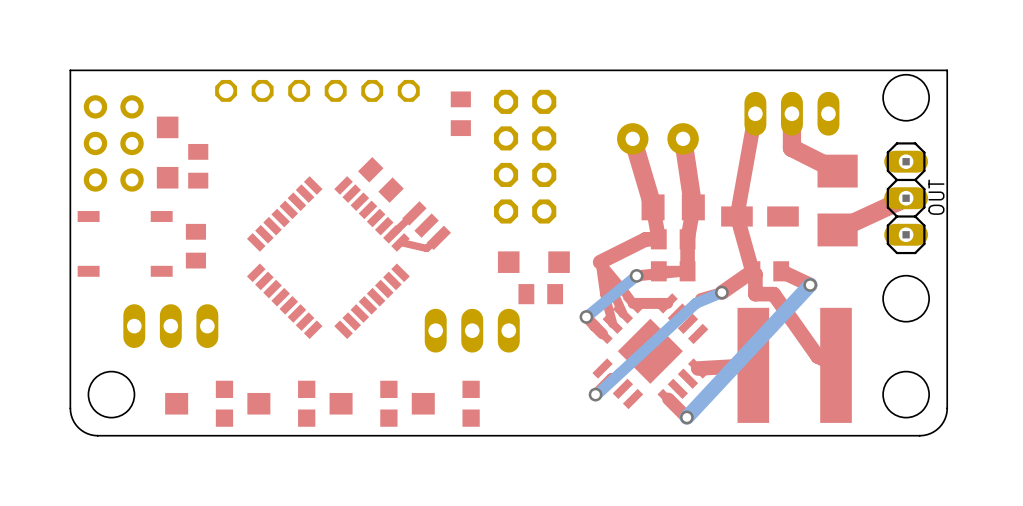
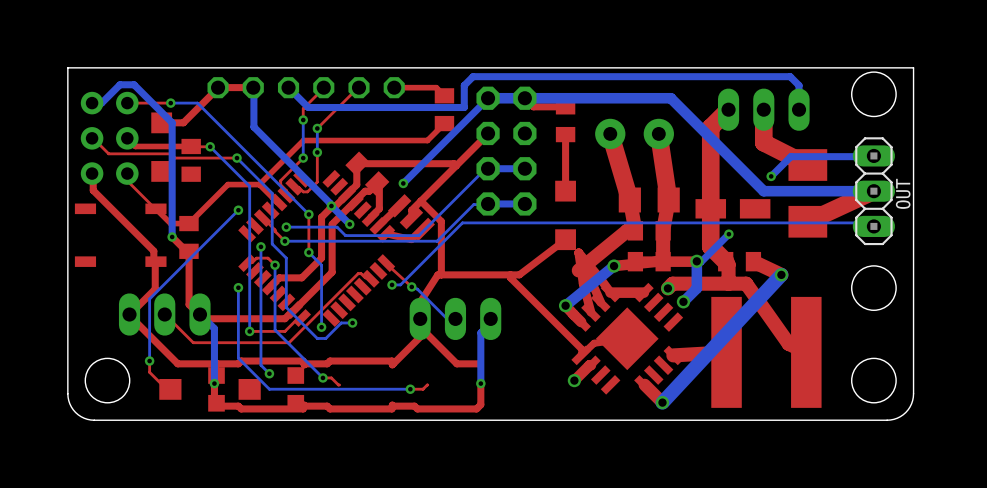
top track: none -> (253, 87) (218, 87) (183, 122) (161, 122)
bottom track: none -> (253, 87) (253, 127) (349, 224)
bottom track: none -> (288, 87) (308, 107) (464, 107) (464, 85) (473, 76) (790, 76) (799, 85) (799, 109)
top track: none -> (323, 87) (303, 108) (303, 120)
top track: none -> (359, 87) (317, 128)
top track: none -> (394, 87) (436, 87) (444, 95)
top track: none -> (524, 98) (533, 106) (565, 106)
bottom track: none -> (92, 103) (101, 103) (120, 84) (134, 84) (172, 122) (172, 236)
top track: none -> (170, 103) (127, 103)
bottom track: none -> (170, 103) (197, 103) (308, 214)
via: none -> (170, 103)
top track: (755, 113) (736, 216) -> (728, 109) (710, 127) (710, 246) (725, 261)
bottom track: none -> (303, 120) (303, 158)
via: none -> (303, 120)
top track: none -> (444, 123) (427, 140) (303, 140) (259, 184) (277, 202) (278, 202) (260, 184) (227, 184) (188, 223) (170, 223) (128, 182) (127, 173)
bottom track: none -> (317, 128) (317, 152)
via: none -> (317, 128)
top track: none -> (488, 133) (411, 210) (411, 217)
top track: none -> (565, 134) (565, 191)
top track: none -> (92, 138) (108, 153) (170, 153) (174, 158) (236, 158)
top track: none -> (127, 138) (135, 146) (210, 146)
bottom track: none -> (210, 146) (249, 186) (249, 331)
via: none -> (210, 146)
top track: none -> (317, 152) (317, 182) (307, 191) (303, 191) (299, 187) (294, 186)
via: none -> (317, 152)
bottom track: none -> (873, 155) (790, 156) (771, 176)
bottom track: none -> (236, 158) (272, 193) (272, 244) (286, 258) (286, 307) (317, 338) (325, 338) (341, 322) (352, 322)
via: none -> (236, 158)
top track: none -> (303, 158) (280, 180) (280, 184) (286, 190) (286, 194)
via: none -> (303, 158)
top track: none -> (456, 165) (454, 163) (357, 163) (356, 184) (347, 194)
bottom track: none -> (524, 168) (485, 169) (418, 235) (345, 235) (337, 227) (286, 227)
top track: none -> (92, 173) (93, 190) (153, 251) (153, 259) (155, 261) (155, 289) (129, 314) (177, 363) (216, 364) (238, 363) (241, 361) (303, 361) (304, 364) (327, 363) (330, 361) (392, 361) (392, 364) (423, 334) (417, 325)
via: none -> (771, 176)
bottom track: none -> (403, 183) (488, 98) (670, 98) (763, 191) (873, 191)
via: none -> (403, 183)
top track: none -> (346, 194) (335, 205) (331, 205) (321, 217) (321, 258) (301, 277) (279, 277) (270, 286)
top track: none -> (420, 201) (441, 221) (441, 274)
bottom track: none -> (524, 203) (473, 204) (437, 241) (284, 241)
via: none -> (331, 205)
top track: (737, 216) (752, 271) (721, 292) (700, 298) -> none
bottom track: none -> (238, 210) (149, 299) (149, 361)
via: none -> (238, 210)
top track: none -> (308, 214) (308, 252)
via: none -> (308, 214)
top track: none -> (262, 218) (284, 241)
top track: none -> (370, 218) (379, 208) (379, 184) (377, 183) (369, 191) (365, 191) (332, 224) (332, 272) (284, 318) (205, 318) (198, 314) (189, 304) (188, 251) (186, 251) (172, 236)
via: none -> (349, 224)
bottom track: none -> (873, 226) (869, 222) (462, 222) (400, 284) (392, 284)
via: none -> (286, 227)
top track: (650, 239) (645, 239) (600, 262) -> (627, 230) (578, 270)
bottom track: none -> (728, 234) (700, 262) (696, 261) (696, 288) (683, 301)
via: none -> (728, 234)
via: none -> (172, 236)
top track: none -> (565, 239) (519, 274) (437, 274) (417, 305) (417, 325)
via: none -> (284, 241)
bottom track: none -> (260, 246) (260, 365) (269, 373)
via: none -> (260, 246)
bottom track: none -> (308, 252) (321, 265) (321, 327)
via: none -> (308, 252)
part rotation: 0° (533, 262) -> 90° clockwise (565, 215)
part position: (533, 262) -> (565, 215)
top track: none -> (696, 261) (663, 261)
via: none -> (696, 261)
top track: none -> (247, 263) (252, 262) (256, 258) (268, 258) (275, 265)
top track: none -> (386, 263) (411, 286)
bottom track: none -> (275, 265) (275, 330) (322, 377)
via: none -> (275, 265)
top track: none -> (510, 274) (510, 277) (582, 349) (581, 355) (594, 343) (627, 338)
top track: none -> (370, 278) (358, 273) (289, 342) (193, 342) (164, 314)
bottom track: (721, 292) (696, 303) (595, 394) -> none
via: (721, 292) -> none
part rotation: 0° (540, 294) -> 90° clockwise (565, 120)
part position: (540, 294) -> (565, 120)
top track: none -> (728, 283) (672, 283) (667, 288)
via: none -> (392, 284)
bottom track: none -> (411, 286) (417, 289) (453, 325)
via: none -> (411, 286)
bottom track: none -> (238, 287) (238, 358) (269, 389) (410, 389)
via: none -> (238, 287)
via: none -> (667, 288)
via: none -> (683, 301)
bottom track: none -> (200, 314) (214, 328) (214, 383)
top track: none -> (302, 318) (297, 318) (284, 331) (249, 331)
via: none -> (352, 322)
top track: none -> (417, 325) (456, 363) (480, 364)
bottom track: none -> (488, 325) (480, 332) (480, 383)
via: none -> (321, 327)
via: none -> (249, 331)
top track: none -> (149, 361) (149, 372) (163, 384)
via: none -> (149, 361)
via: none -> (269, 373)
top track: none -> (322, 377) (331, 377) (339, 384)
via: none -> (322, 377)
via: none -> (214, 383)
top track: none -> (480, 383) (480, 404) (476, 408) (417, 408) (414, 406) (392, 405) (392, 408) (330, 408) (327, 406) (304, 405) (303, 408) (241, 408) (238, 406) (216, 405) (214, 383)
via: none -> (480, 383)
top track: none -> (427, 384) (423, 389) (410, 389)
part: (363, 403) -> none
via: none -> (410, 389)
part: (445, 403) -> none

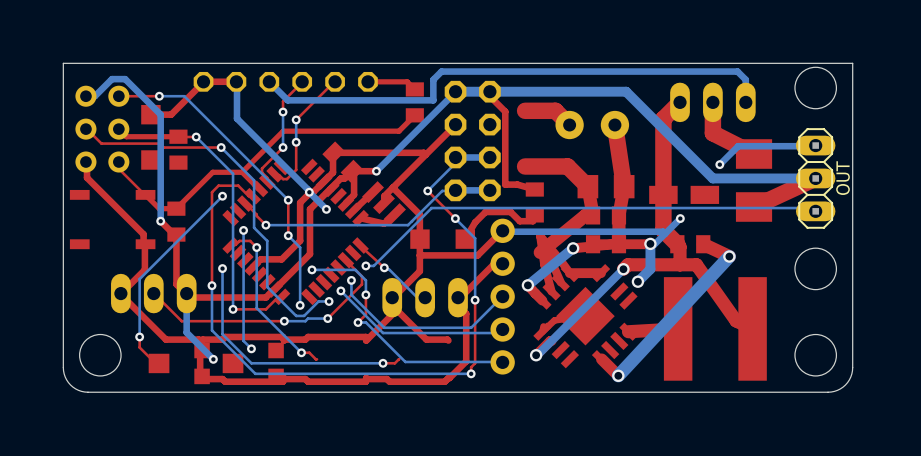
top track: none -> (485, 91) (505, 111) (505, 184) (517, 184) (534, 189)
top track: (524, 98) (533, 106) (565, 106) -> none
top track: none -> (525, 110) (555, 110) (569, 125)
part: (565, 120) -> none
top track: (610, 133) (629, 200) -> (525, 166) (567, 166) (587, 186)
top track: (565, 134) (565, 191) -> none
bottom track: (488, 168) (485, 169) (418, 235) (345, 235) (337, 227) (286, 227) -> (455, 157) (450, 157) (458, 160) (427, 190)
part footprint: [555, 180, 576, 251] -> [525, 182, 544, 223]
top track: none -> (376, 171) (352, 171)
top track: none -> (427, 190) (455, 218)
via: none -> (427, 190)
top track: none -> (252, 196) (248, 196) (238, 185) (218, 185) (212, 192) (212, 285)
top track: (441, 221) (441, 274) -> (411, 206) (419, 214) (419, 271) (390, 300) (390, 303)
via: (286, 227) -> none
top track: none -> (534, 215) (533, 221) (519, 221) (510, 212) (485, 212) (475, 222) (465, 239)
bottom track: none -> (455, 218) (475, 238) (475, 300)
via: none -> (455, 218)
top track: (565, 239) (519, 274) (437, 274) (417, 305) (417, 325) -> none
bottom track: none -> (502, 230) (663, 231) (665, 233)
top track: none -> (501, 231) (502, 230) (477, 255) (419, 255)
part: none -> (442, 239)
top track: (510, 274) (510, 277) (582, 349) -> none
top track: (370, 278) (358, 273) (289, 342) (193, 342) -> (284, 321) (180, 319)
top track: none -> (345, 260) (361, 276) (361, 284) (327, 318)
bottom track: none -> (623, 269) (535, 357)
bottom track: none -> (311, 269) (355, 269) (365, 280) (365, 294)
via: none -> (311, 269)
bottom track: none -> (351, 280) (351, 294) (384, 327) (471, 327) (502, 296)
via: none -> (351, 280)
bottom track: none -> (212, 285) (212, 330) (255, 373) (471, 373)
via: none -> (212, 285)
bottom track: none -> (340, 290) (383, 333) (498, 333) (502, 329)
via: none -> (340, 290)
bottom track: (200, 314) (214, 328) (214, 383) -> (186, 293) (186, 332) (213, 359)
top track: none -> (365, 294) (365, 314) (358, 322)
via: none -> (365, 294)
part: none -> (502, 296)
top track: none -> (475, 300) (475, 363) (471, 367) (471, 373)
via: none -> (475, 300)
bottom track: (488, 325) (480, 332) (480, 383) -> none
bottom track: none -> (327, 318) (284, 321)
via: none -> (327, 318)
via: none -> (284, 321)
bottom track: none -> (358, 322) (365, 322) (405, 361) (502, 362)
via: none -> (358, 322)
via position: (214, 383) -> (213, 359)
top track: (480, 383) (480, 405) -> (502, 263) (493, 264) (456, 301) (455, 303) (466, 313) (466, 361) (448, 378)
via position: (480, 383) -> (471, 373)

